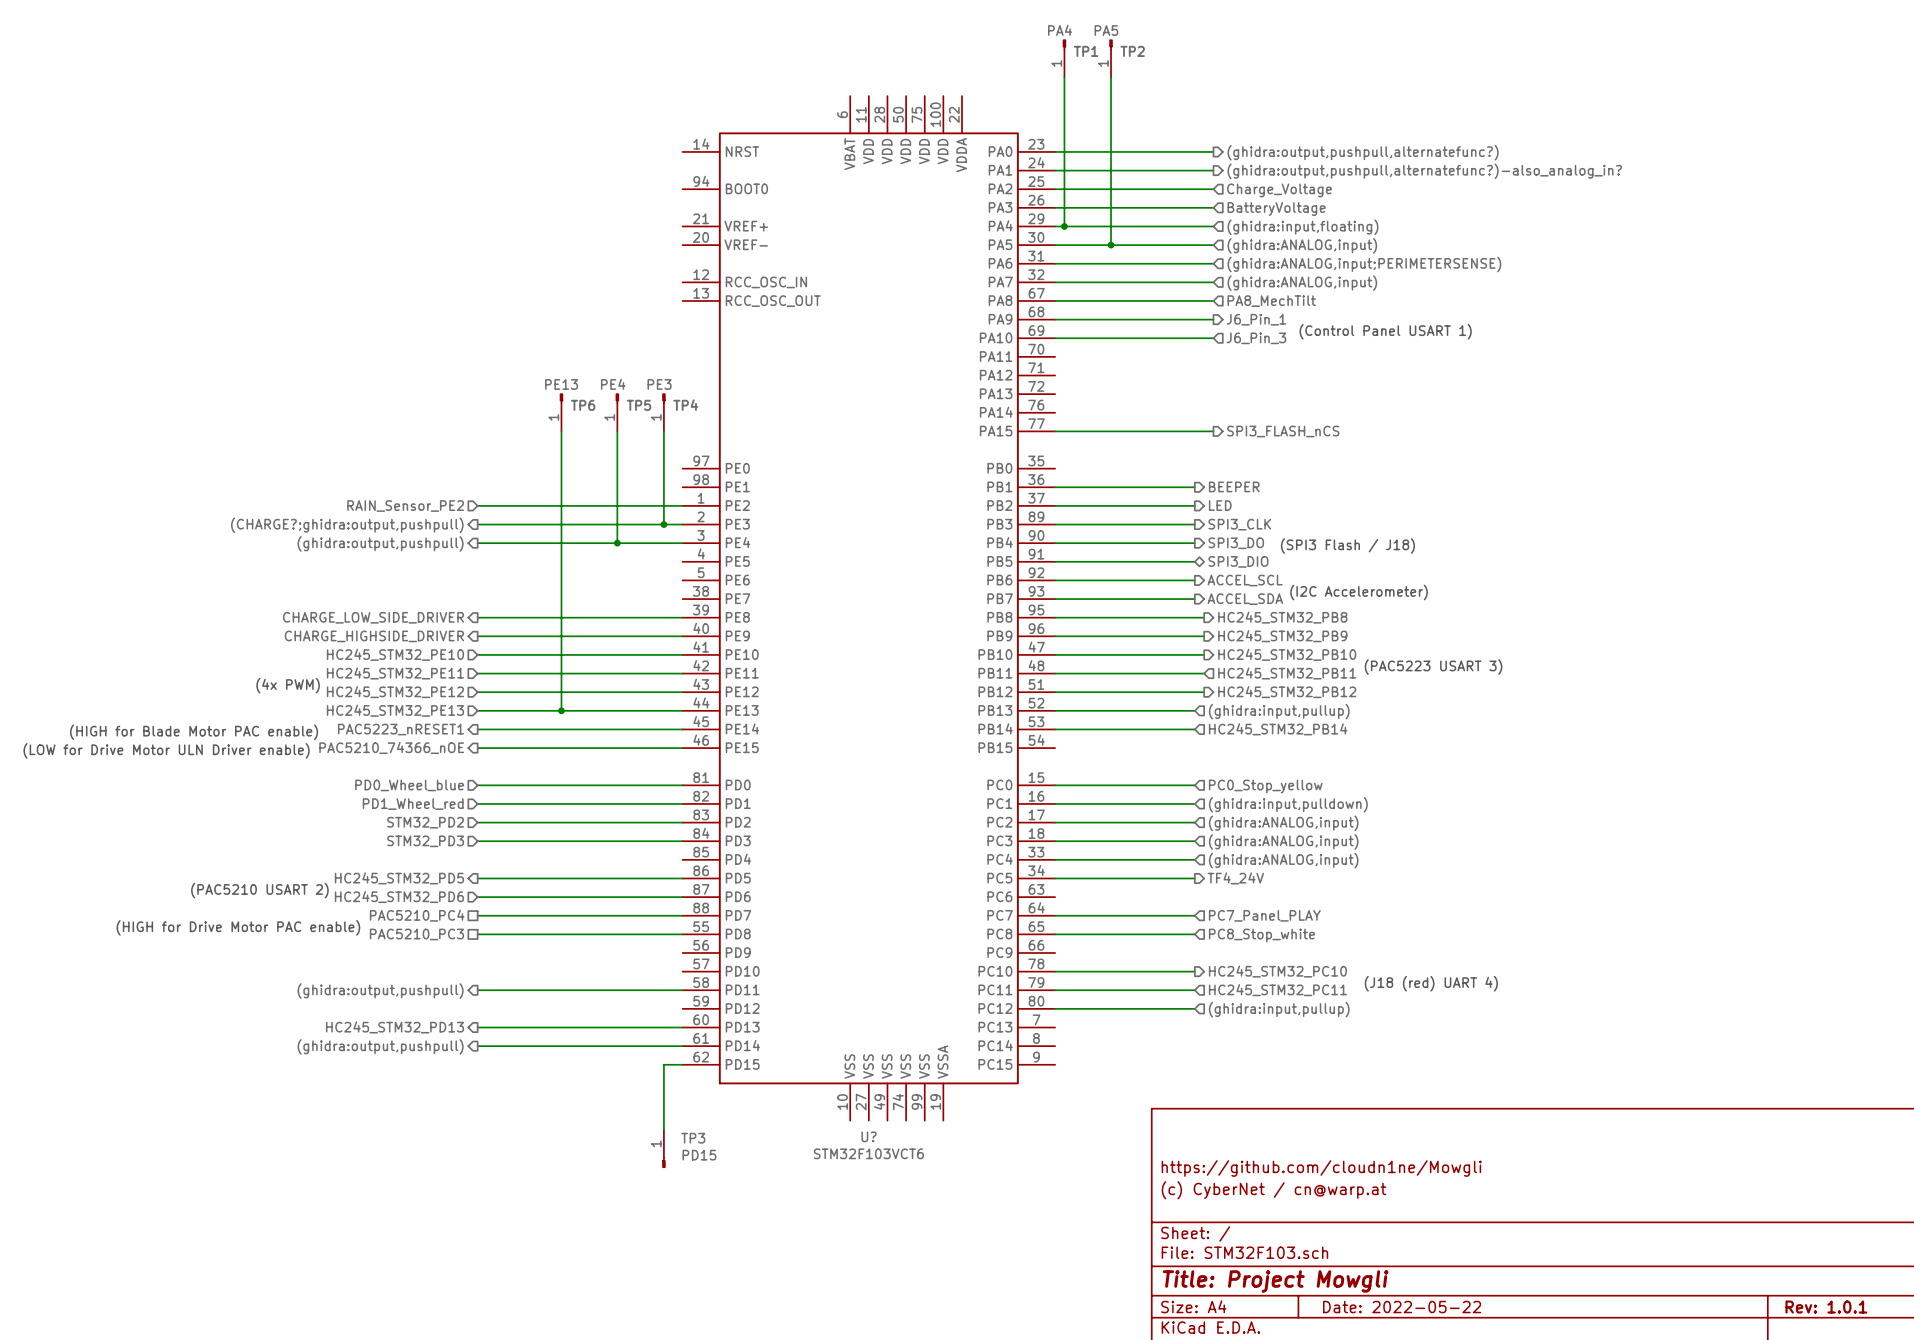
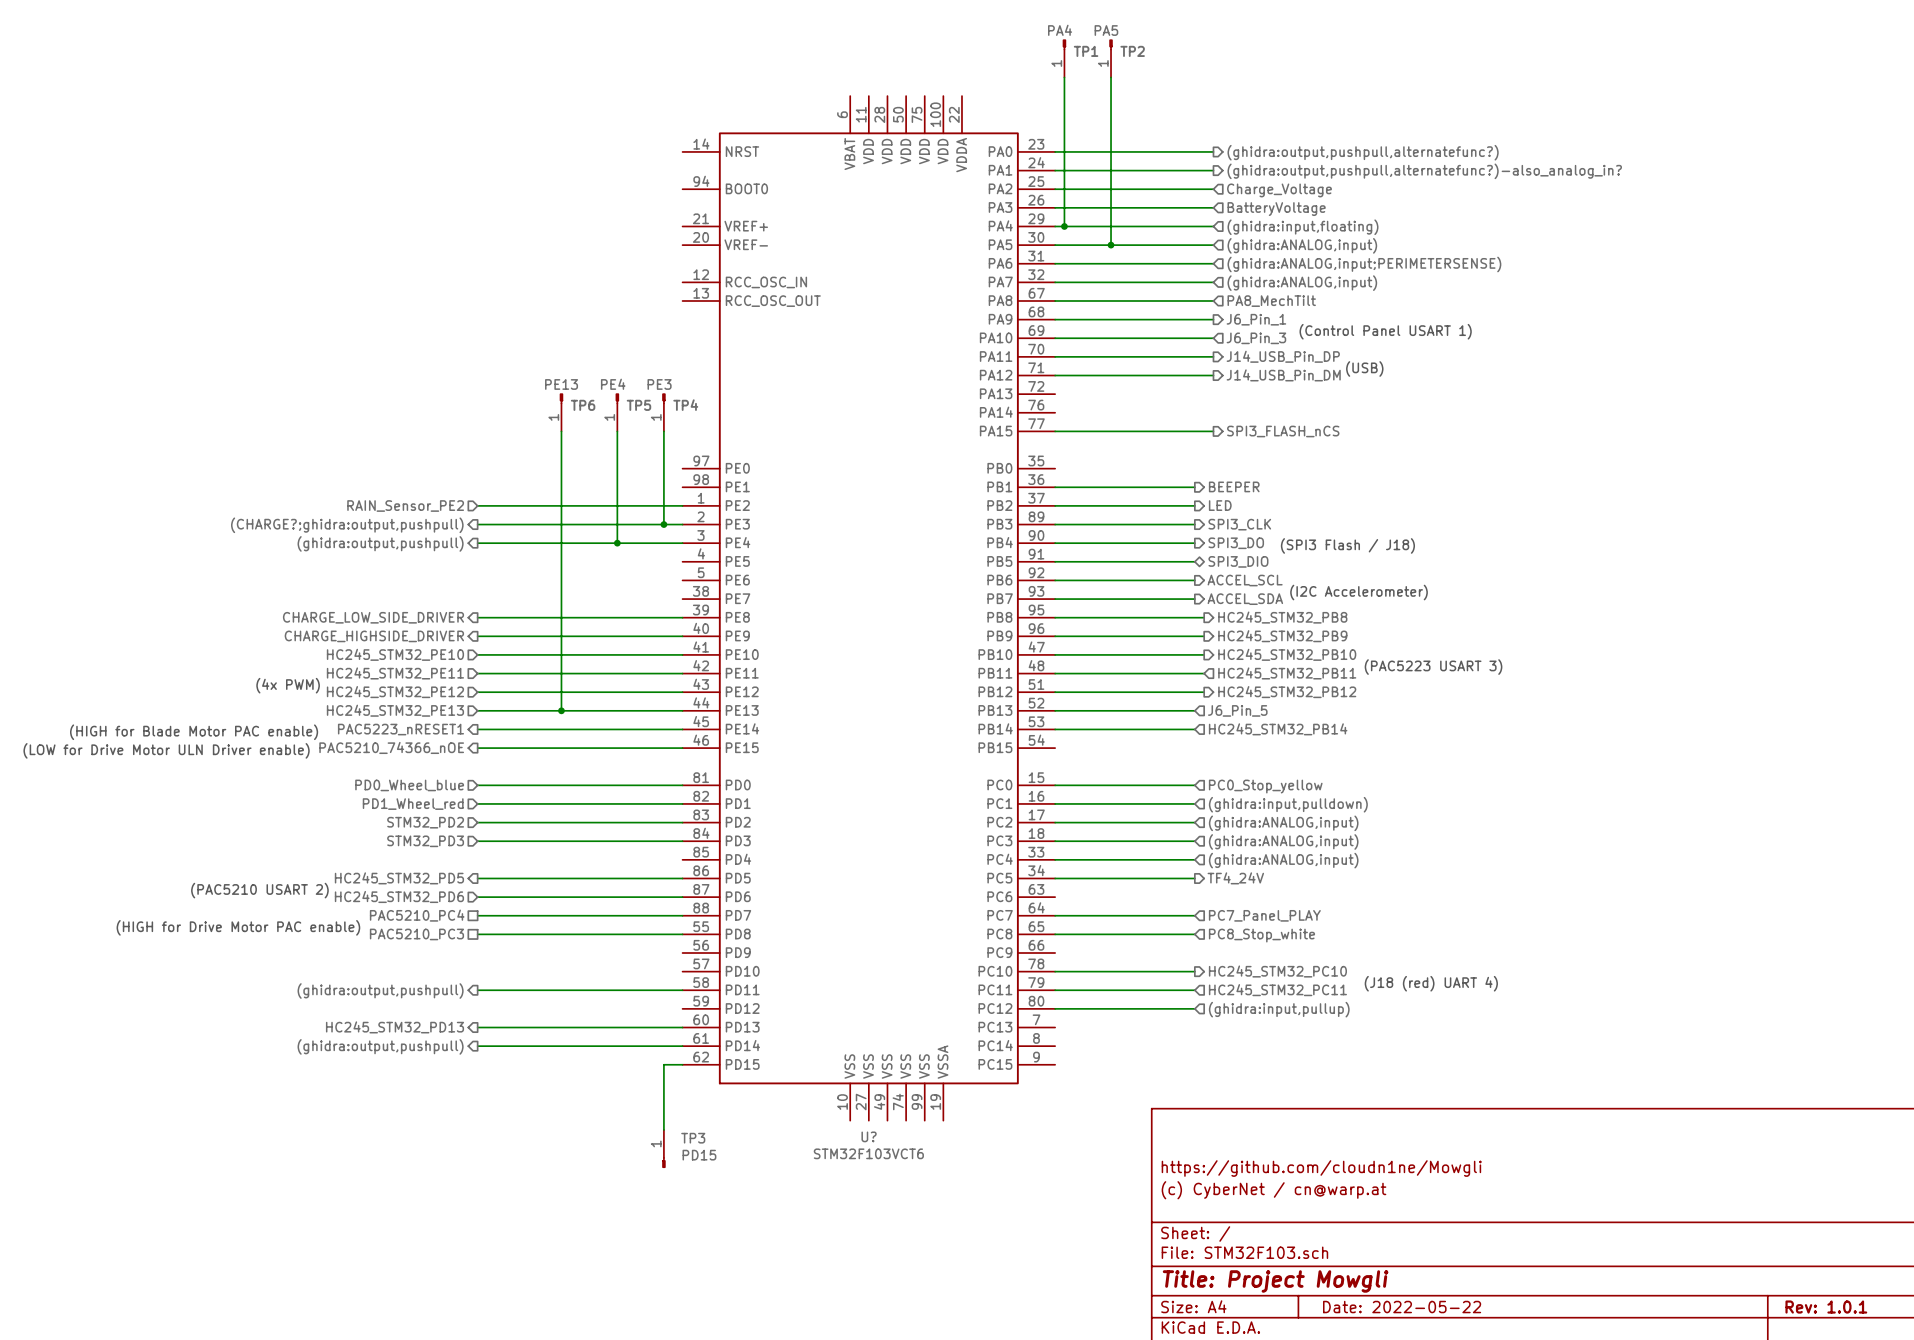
wire: none -> (1055, 356) (1213, 356)
hierarchical label: none -> J14_USB_Pin_DP (1283, 356)
text: none -> (USB) (1364, 368)
wire: none -> (1055, 375) (1213, 375)
hierarchical label: none -> J14_USB_Pin_DM (1283, 375)
hierarchical label: (ghidra:input,pullup) (1279, 711) -> J6_Pin_5 (1237, 710)

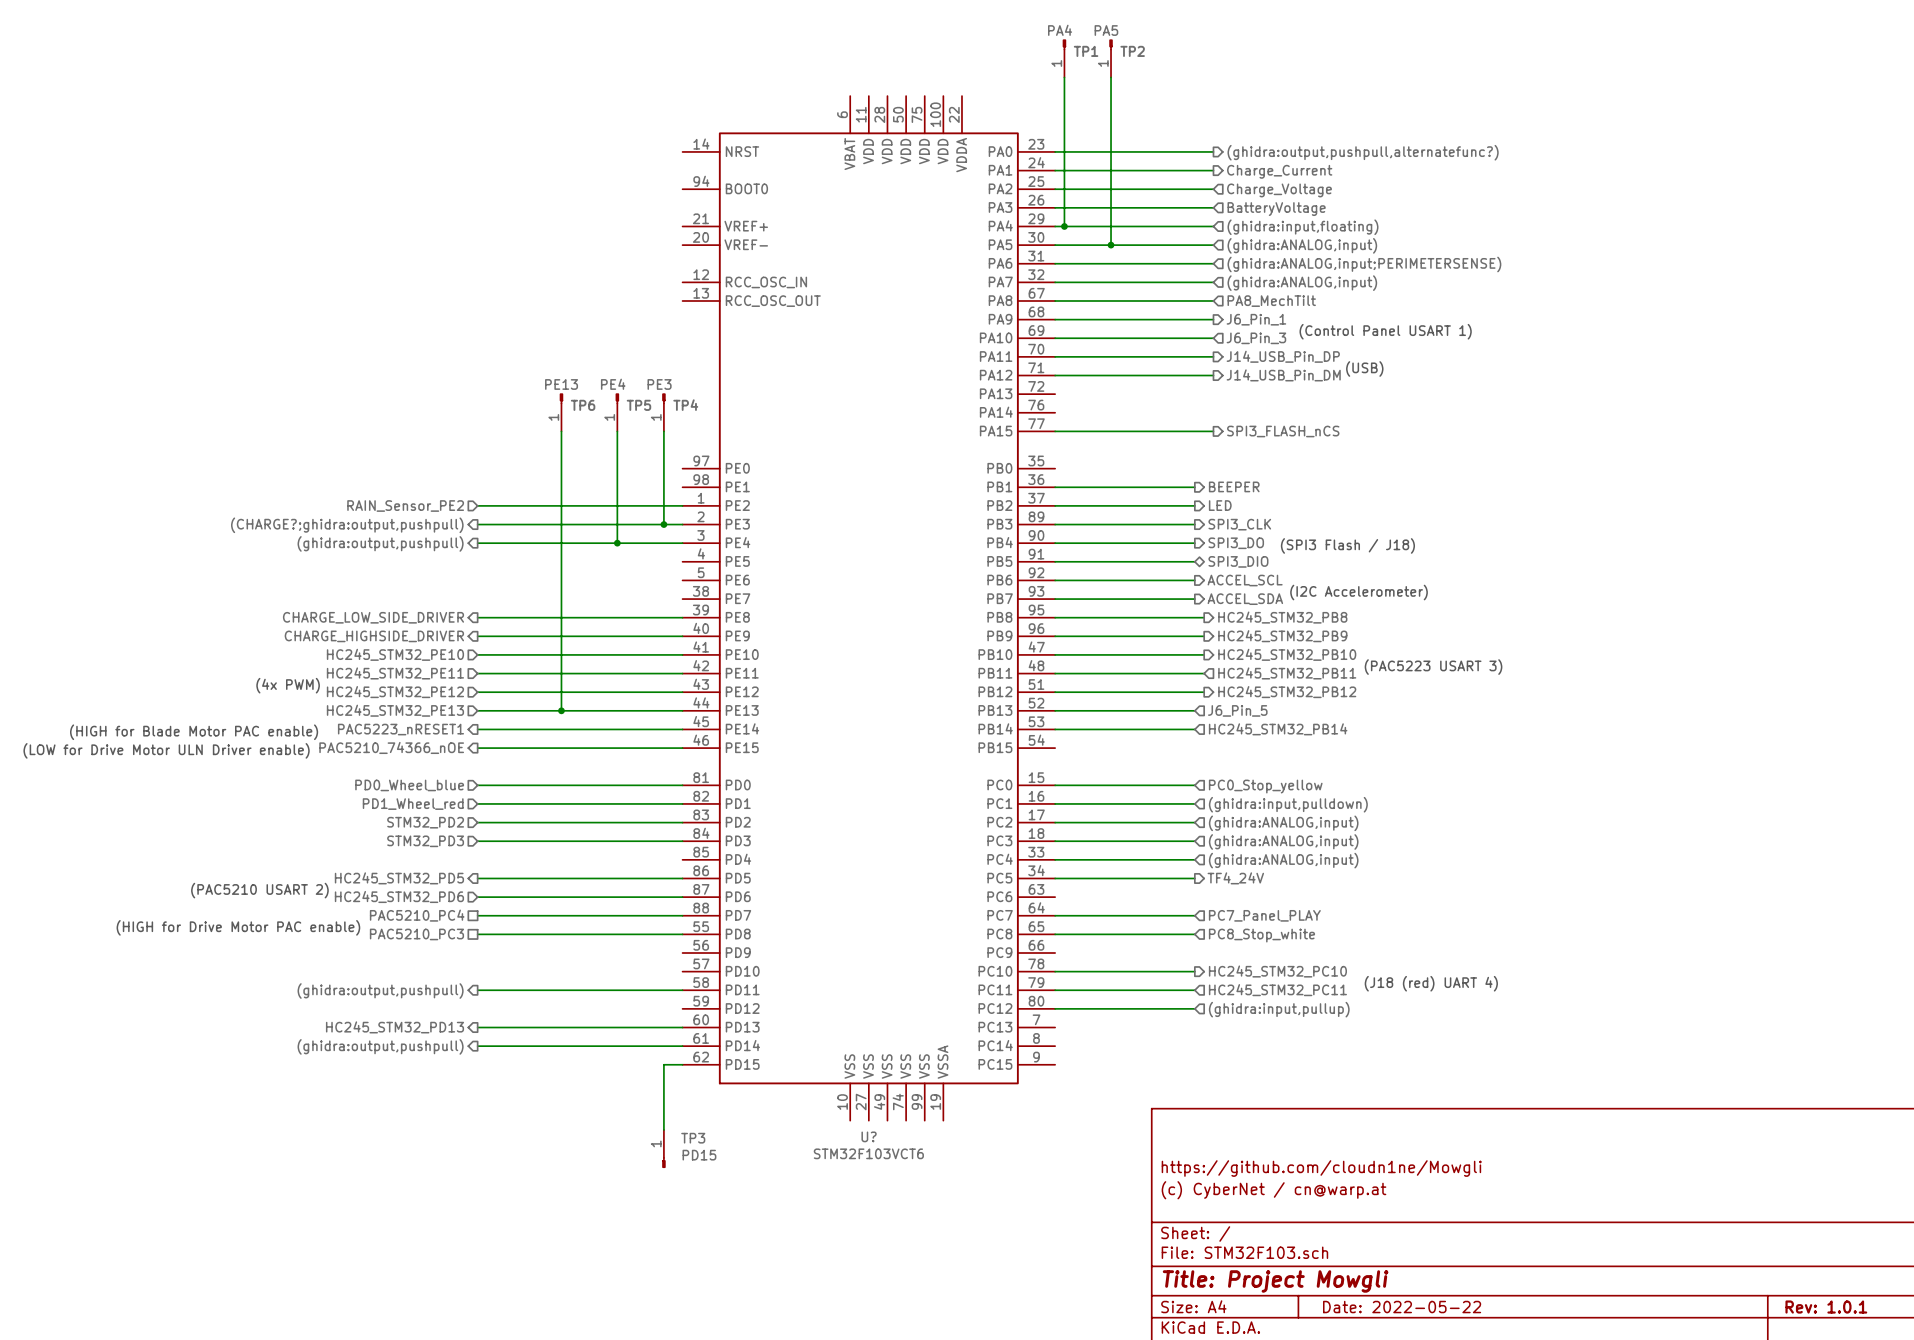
hierarchical label: (ghidra:output,pushpull,alternatefunc?)-also_analog_in? (1424, 171) -> Charge_Current (1279, 171)

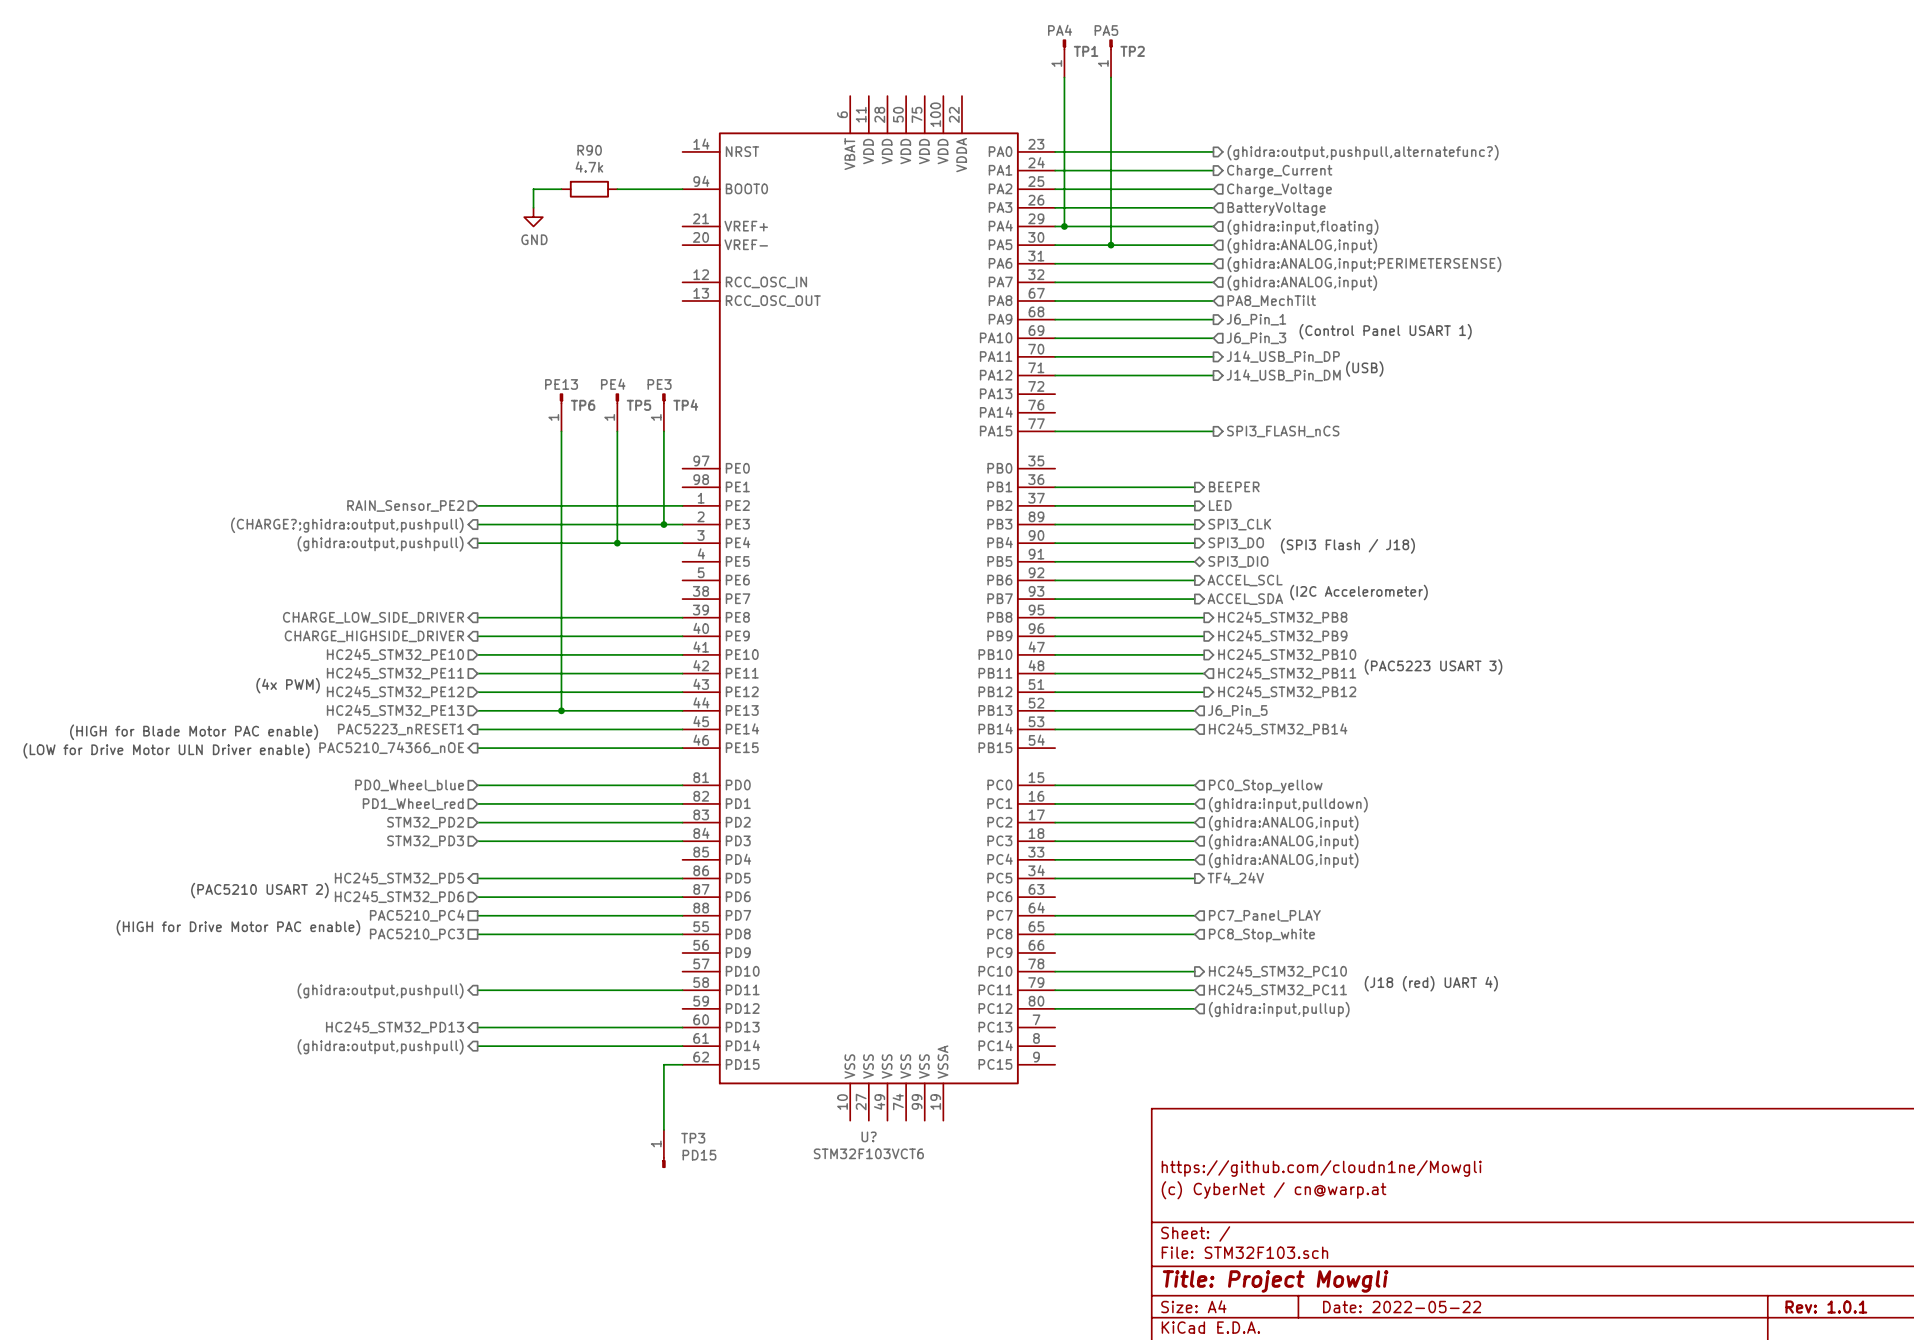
wire: none -> (561, 189) (533, 189) (533, 207)
R90: none -> 4.7k (589, 189)
wire: none -> (617, 189) (682, 189)
power symbol: none -> GND (533, 217)

